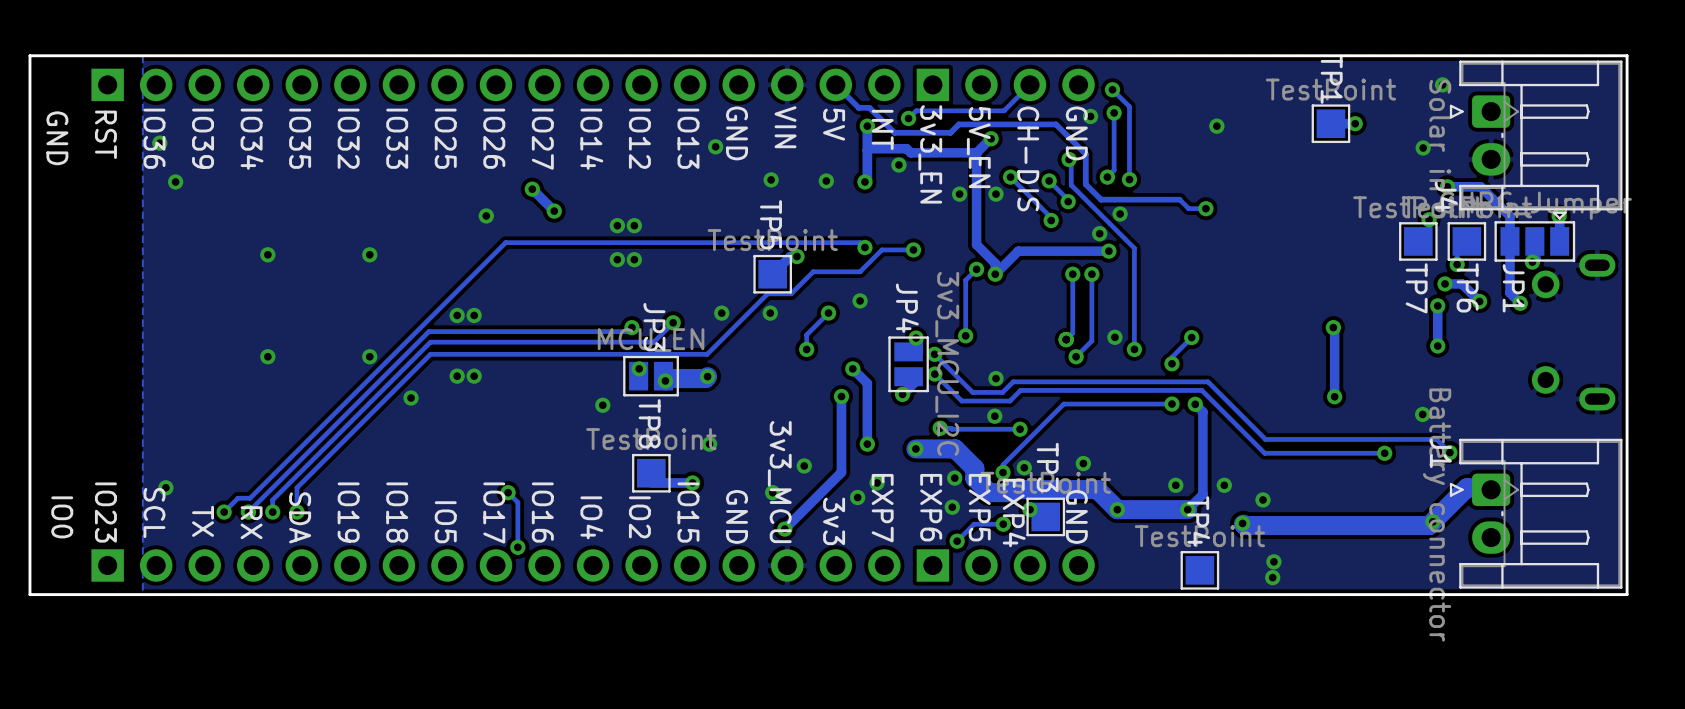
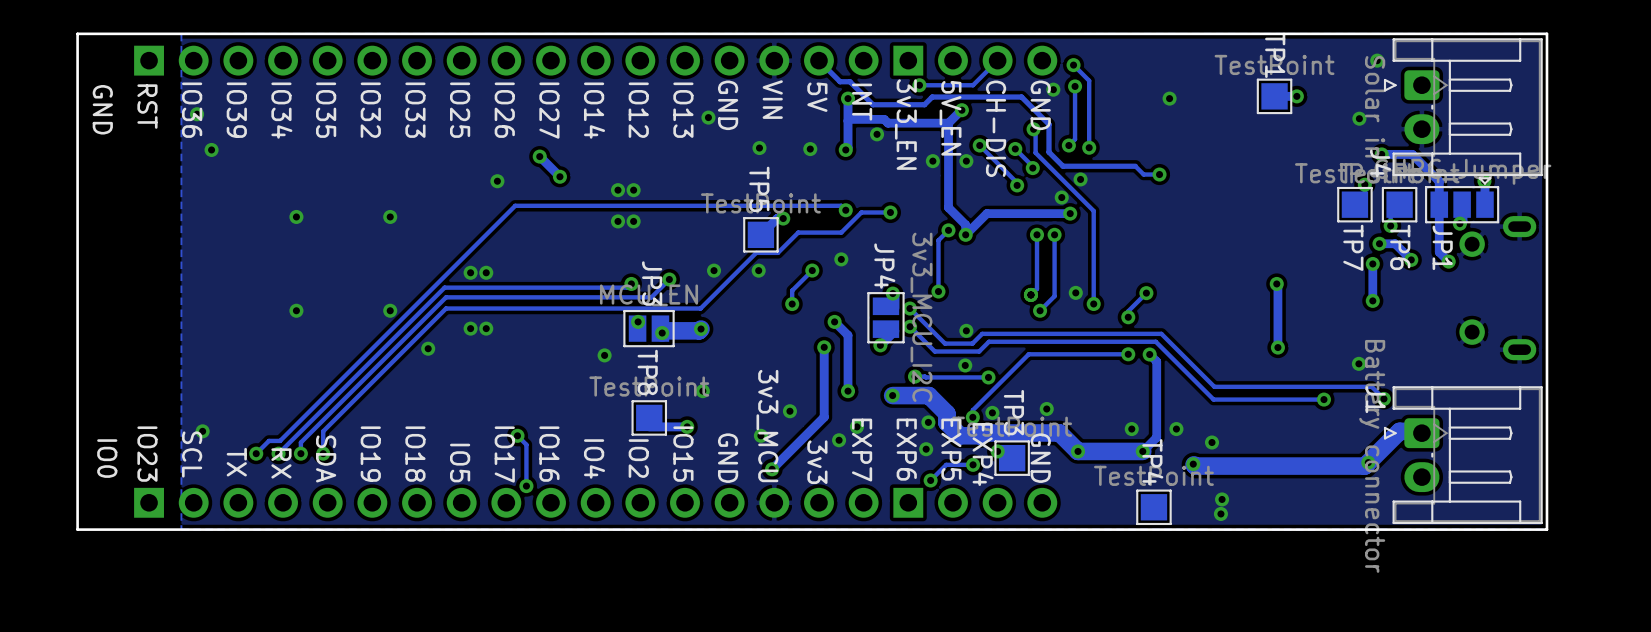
track: (1004, 110) (916, 110) (908, 118) -> (973, 84) (919, 85)
via position: (908, 118) -> (919, 85)

